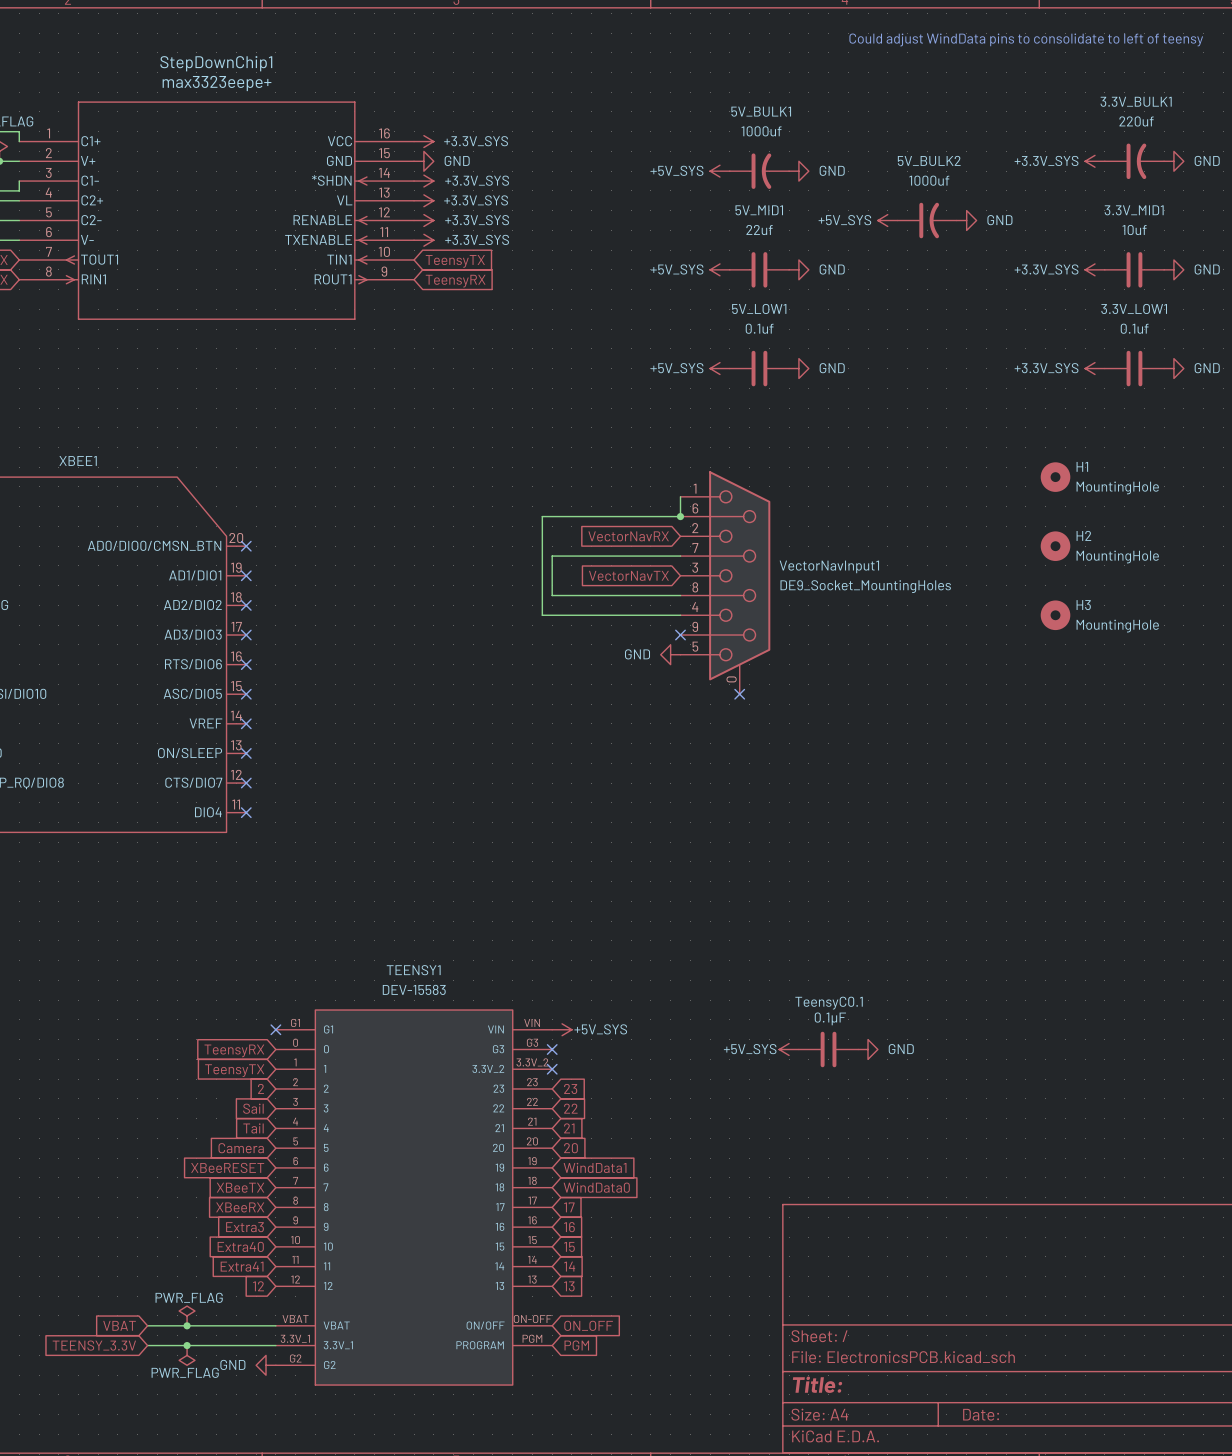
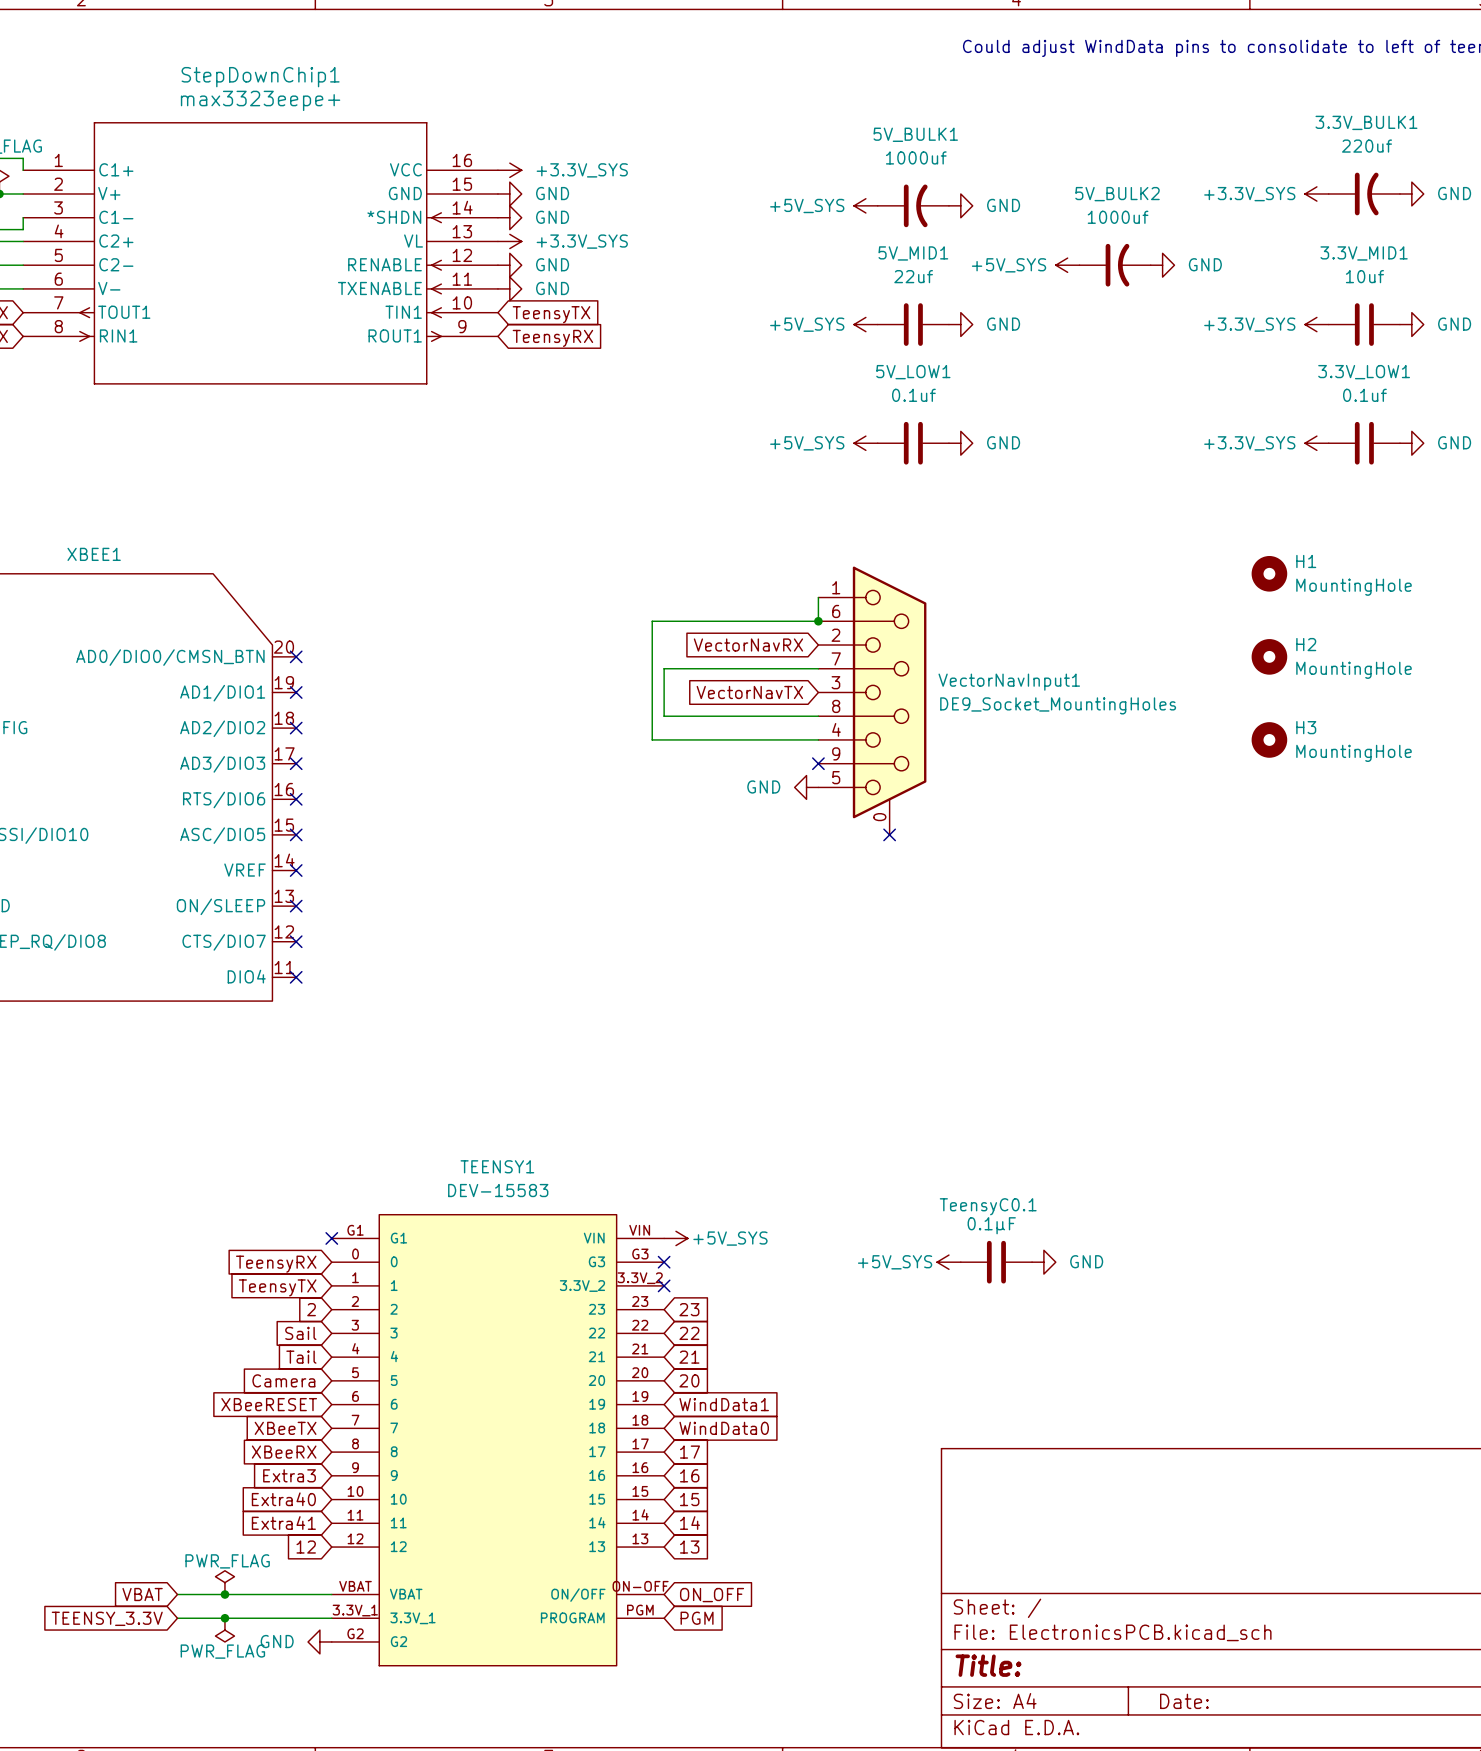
power symbol: +3.3V_SYS (423, 181) -> GND (509, 217)
power symbol: +3.3V_SYS (423, 220) -> GND (509, 265)
power symbol: +3.3V_SYS (423, 240) -> GND (509, 288)

